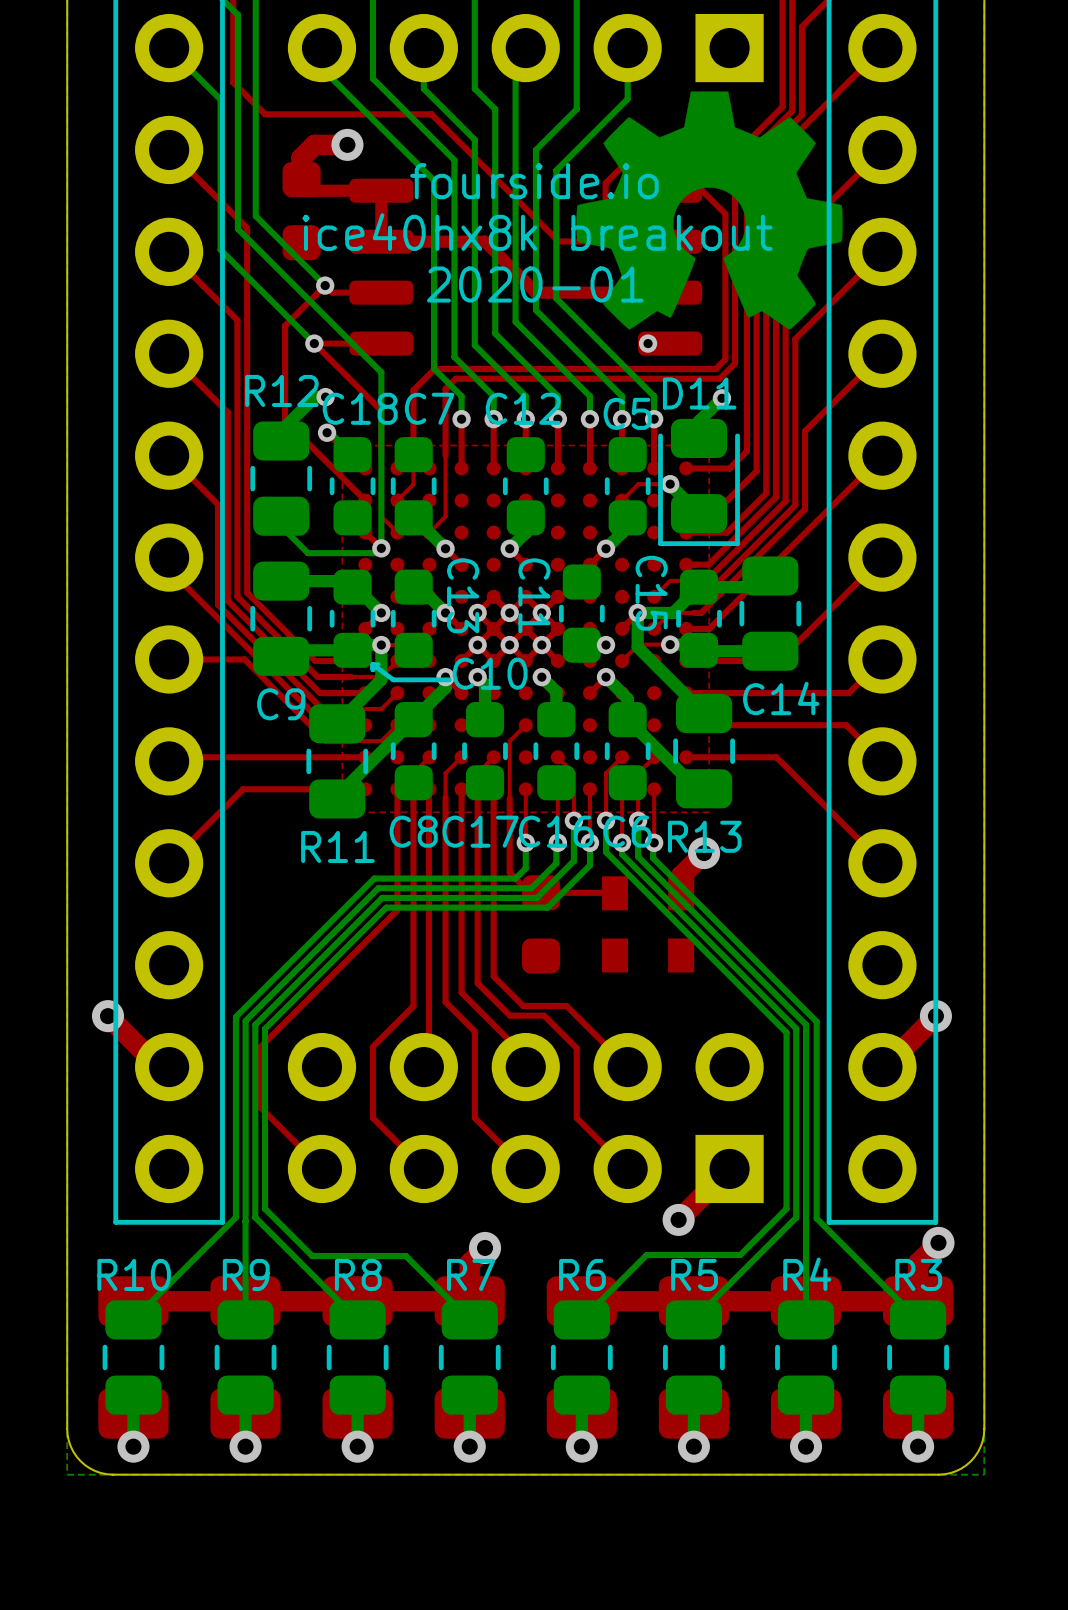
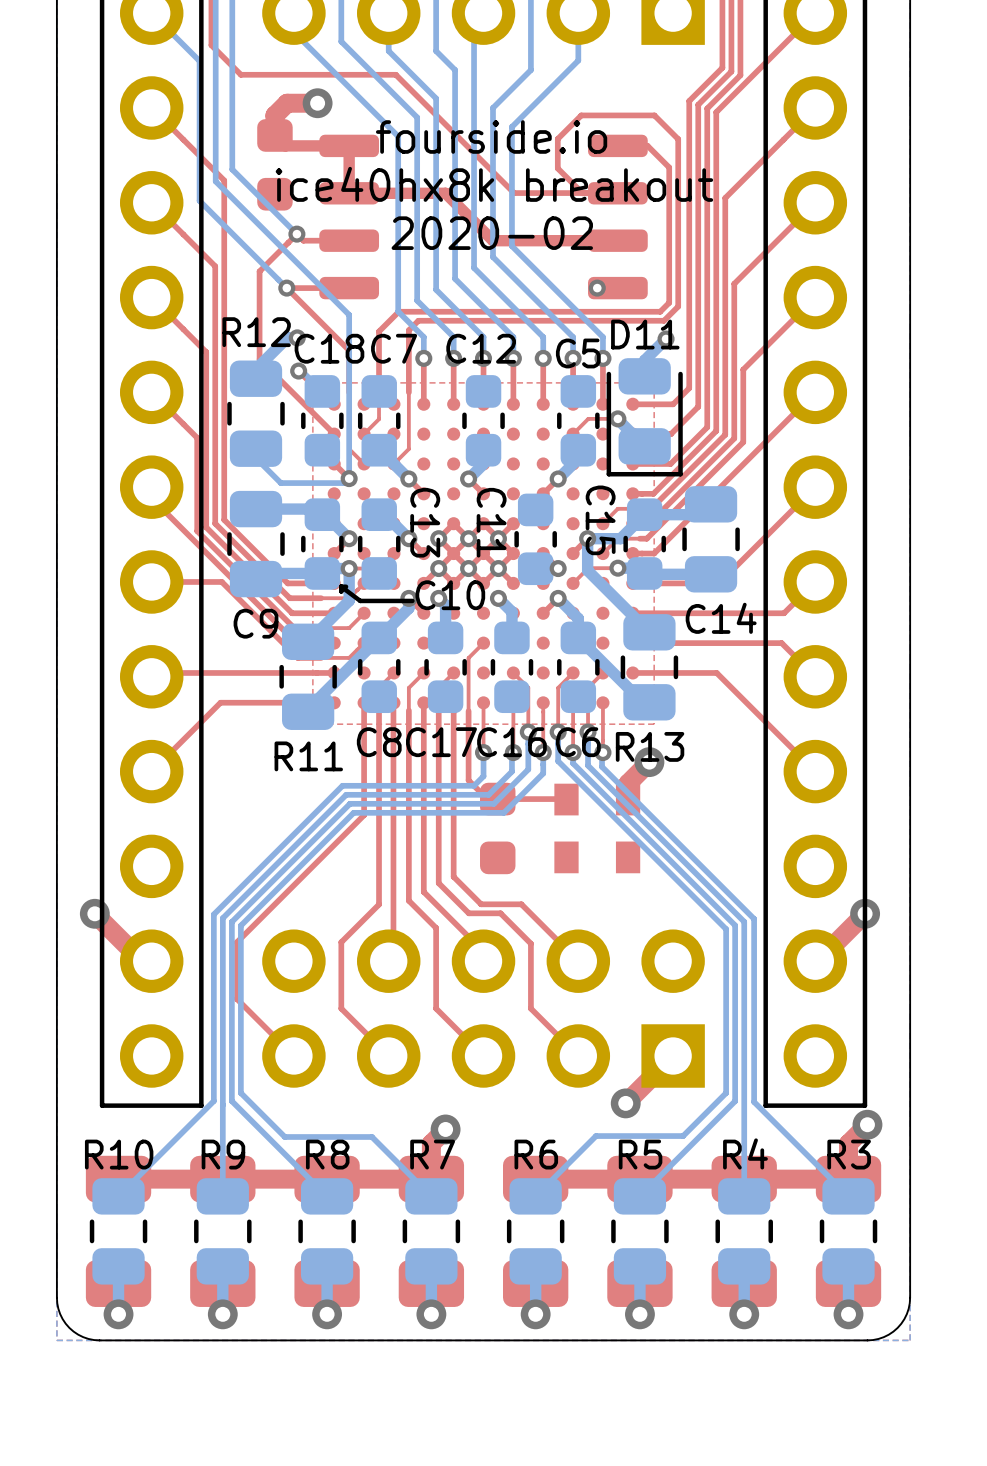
drawing: [576, 91, 843, 330] -> none
text: 2020-01 (535, 284) -> 2020-02 (492, 233)

